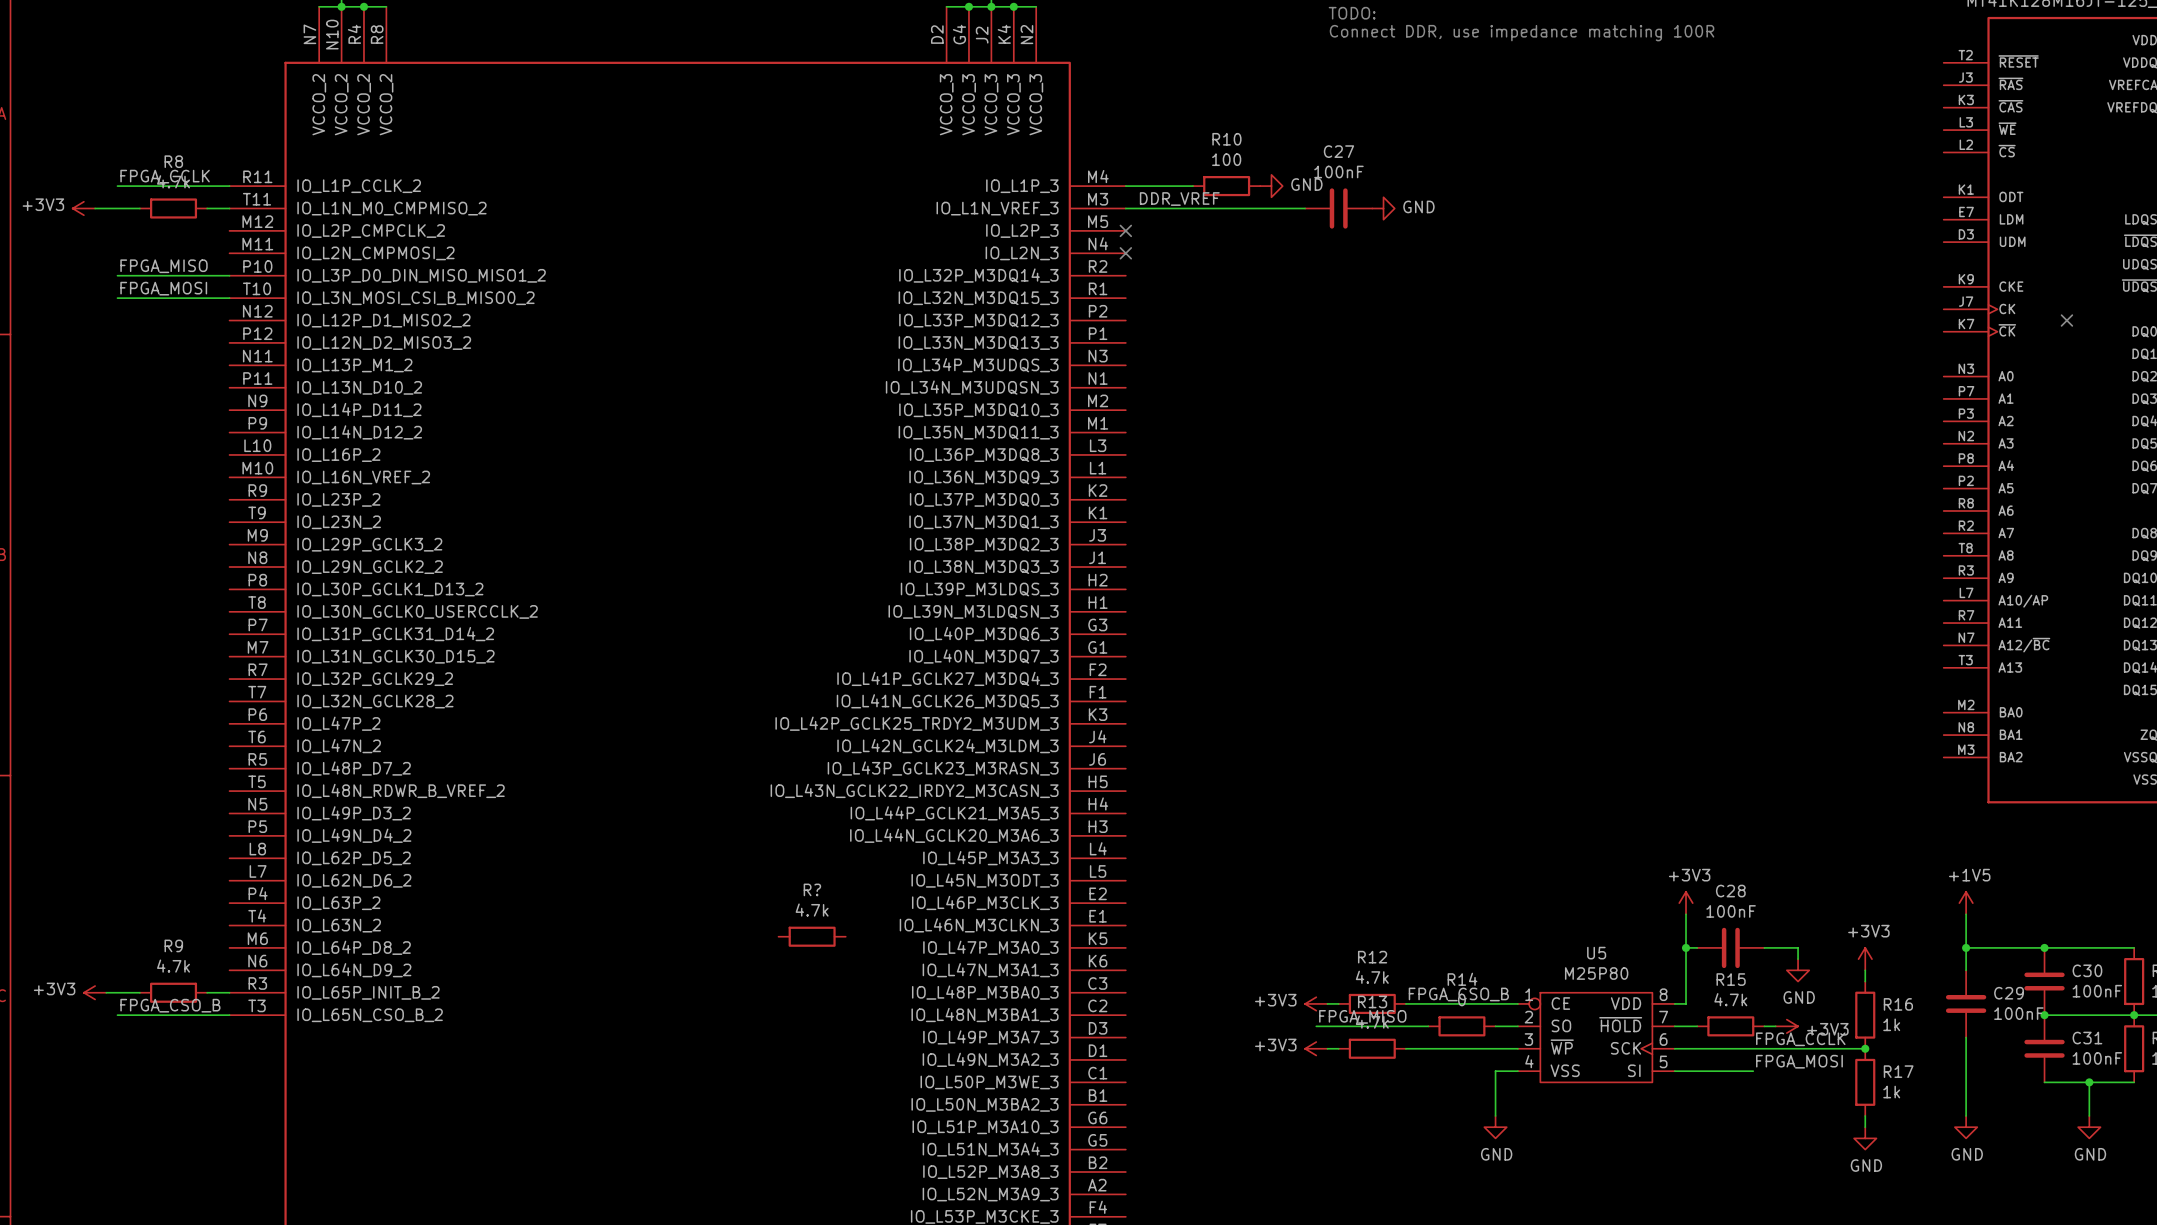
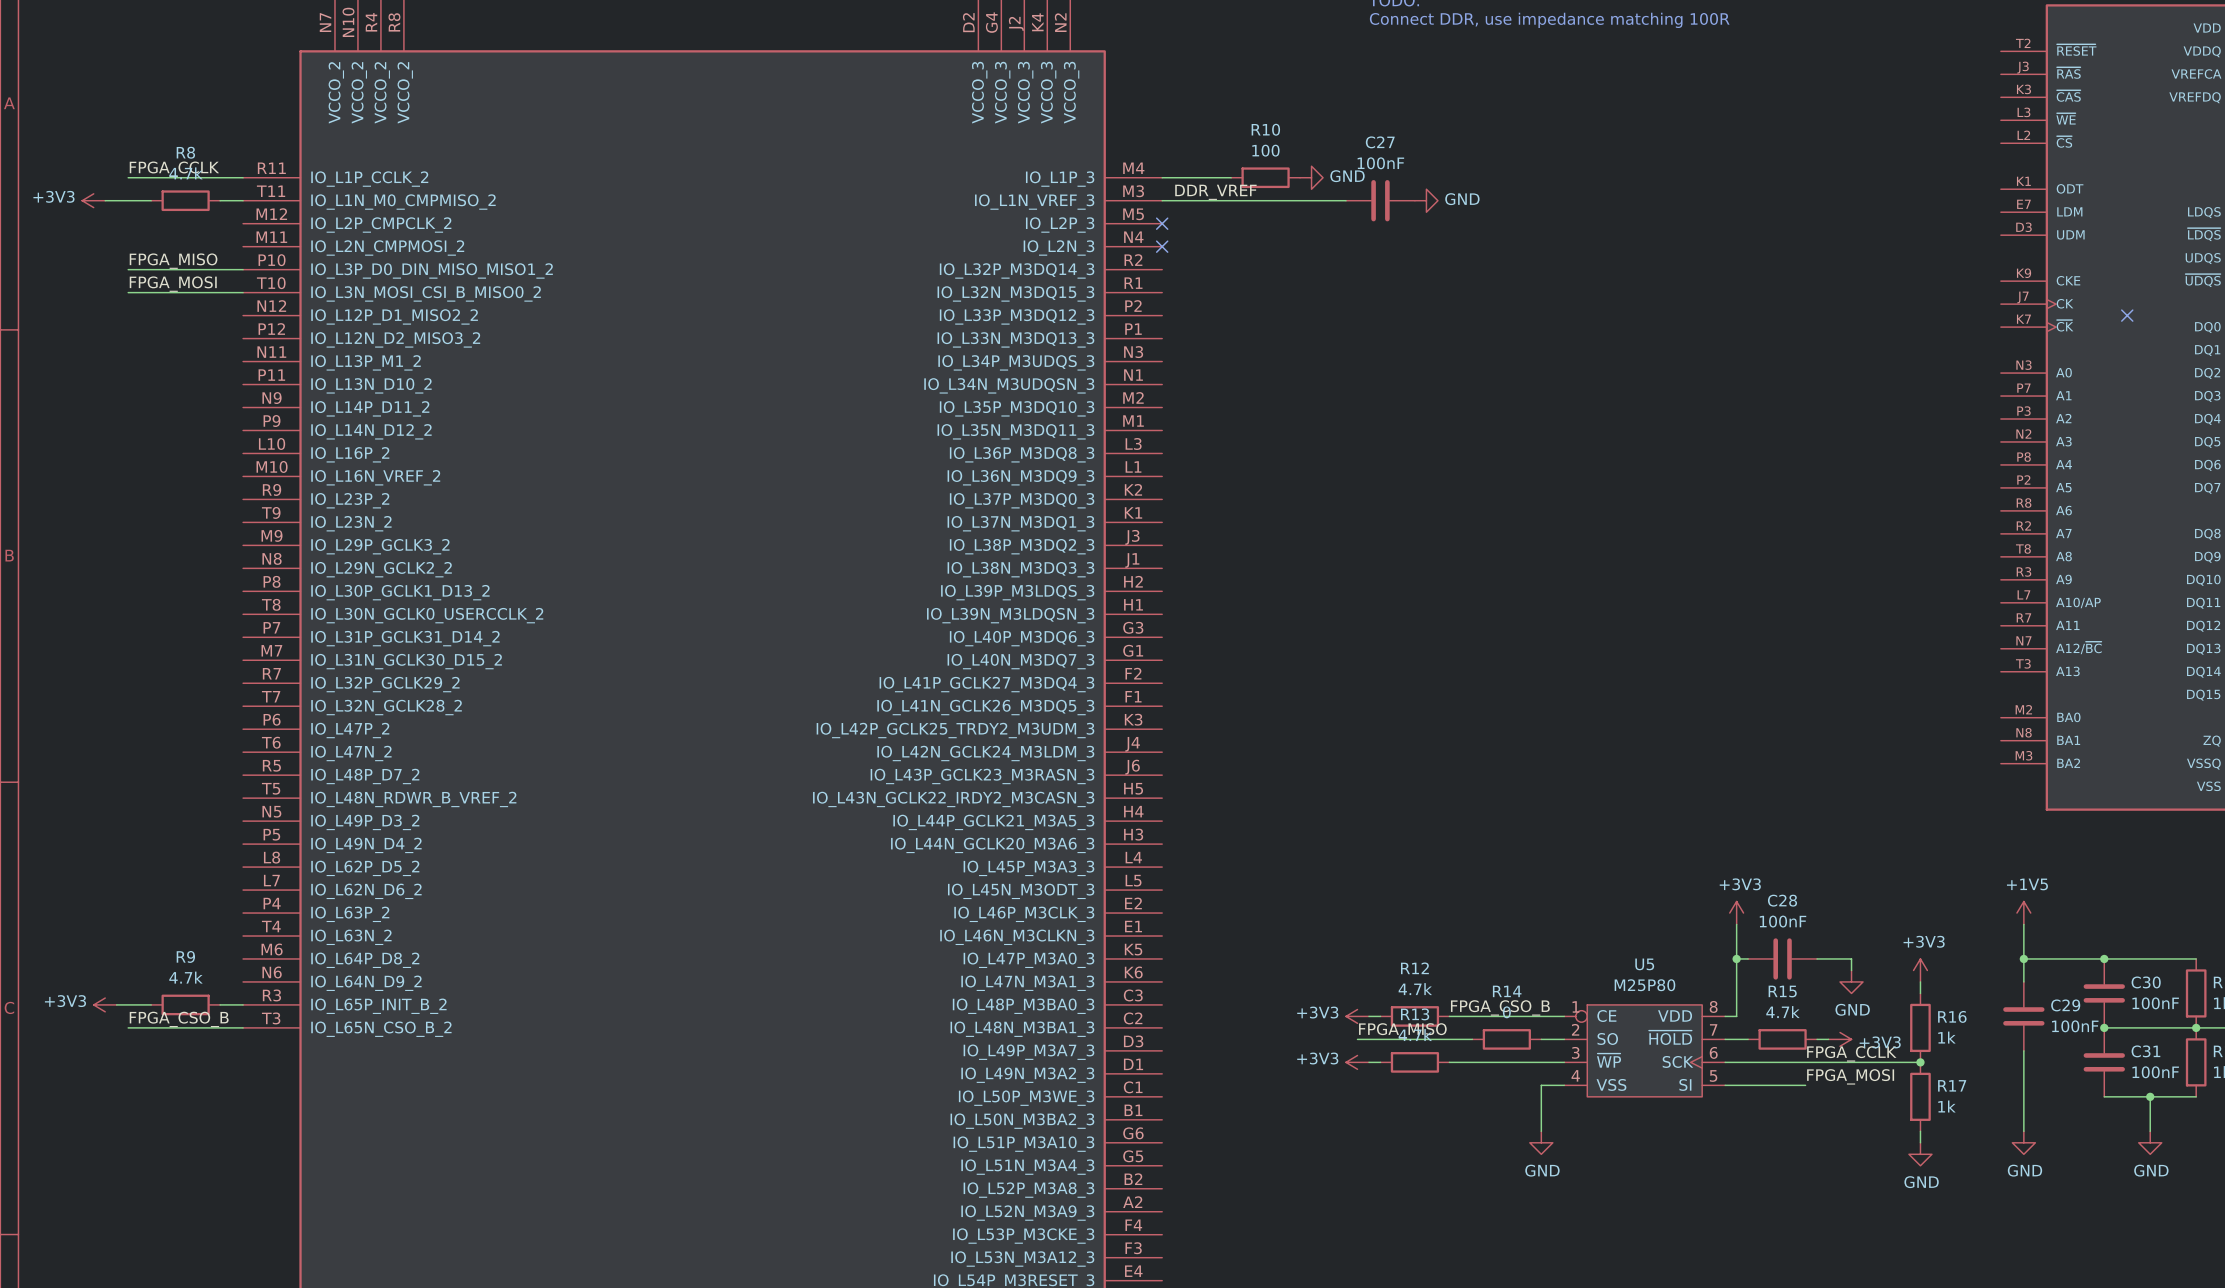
R?: 4.7k (812, 936) -> none

